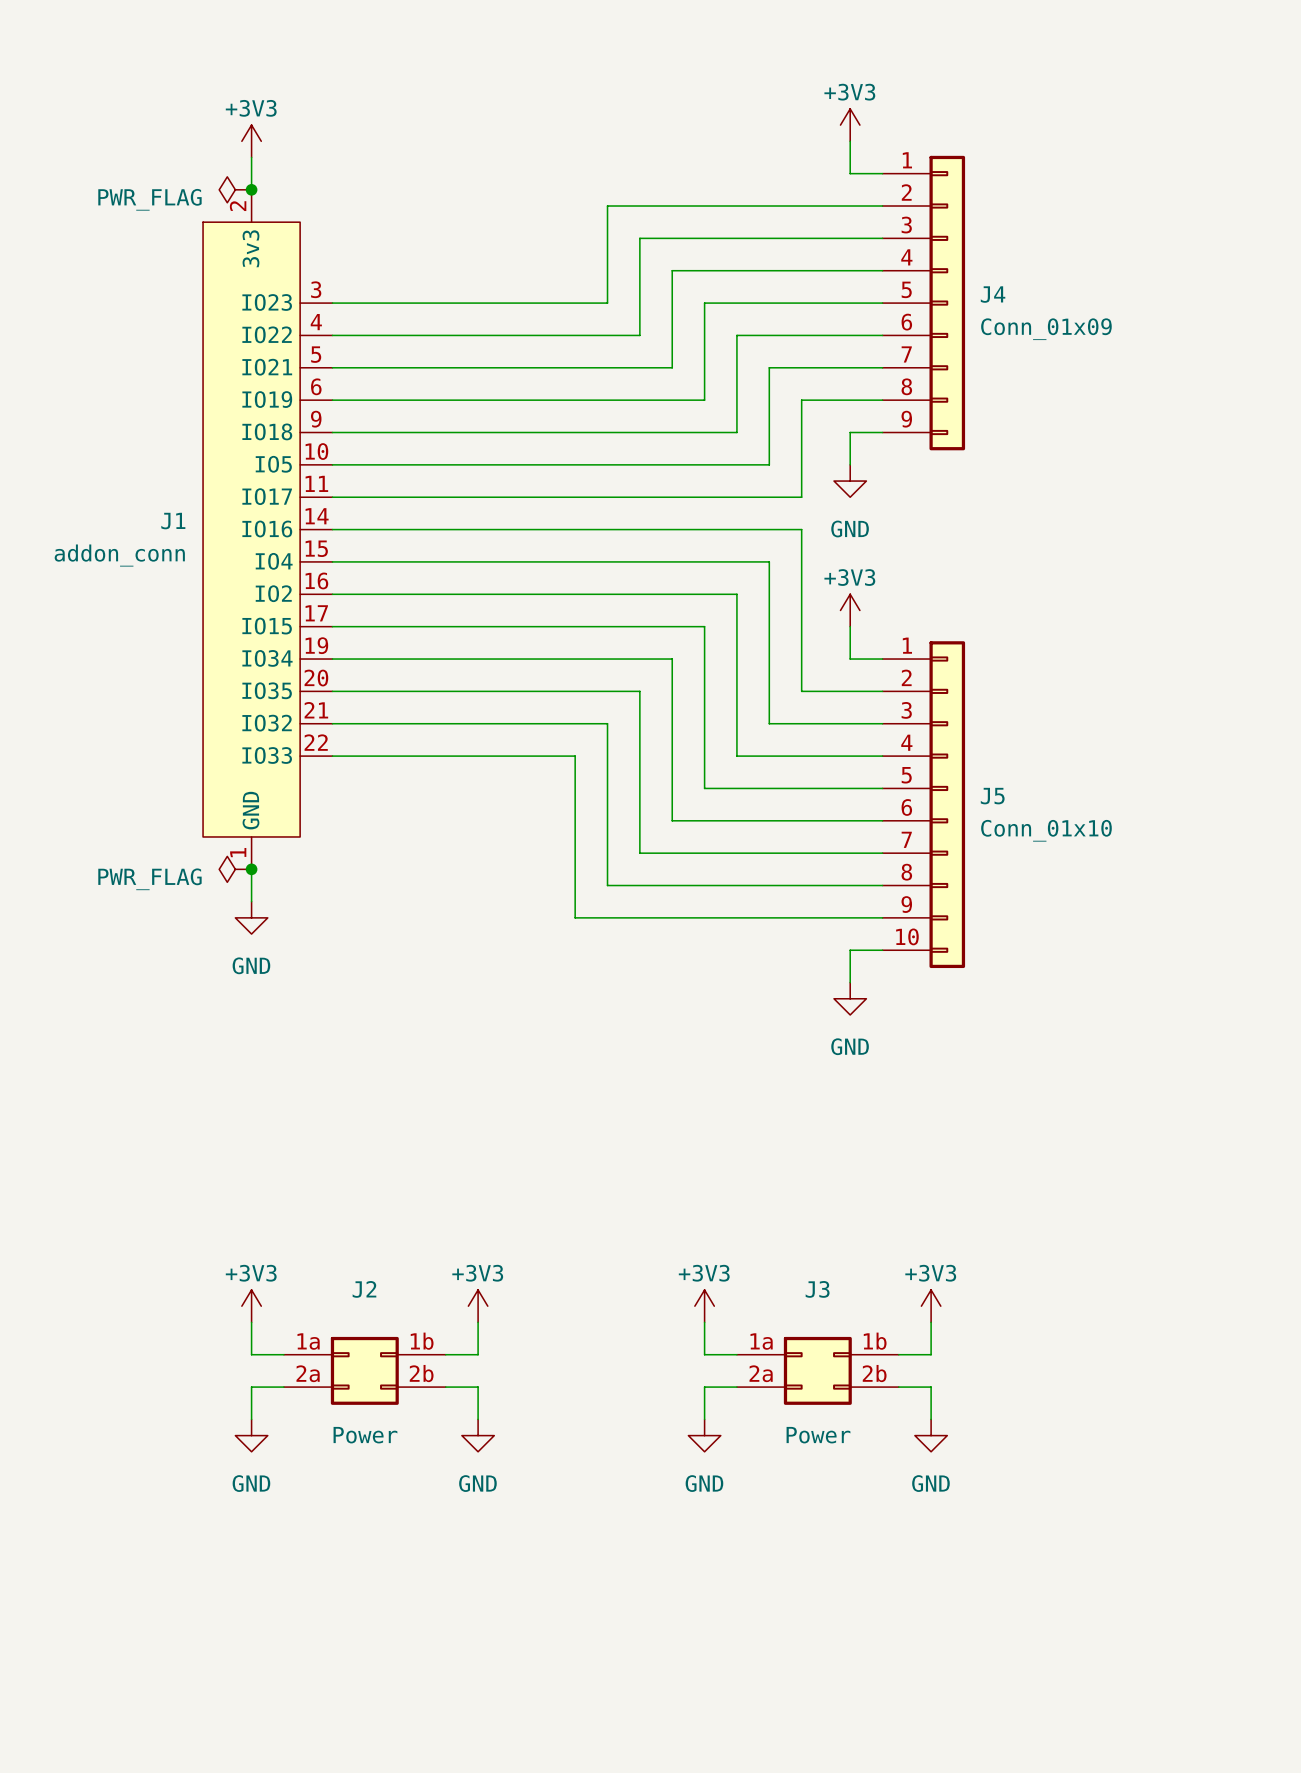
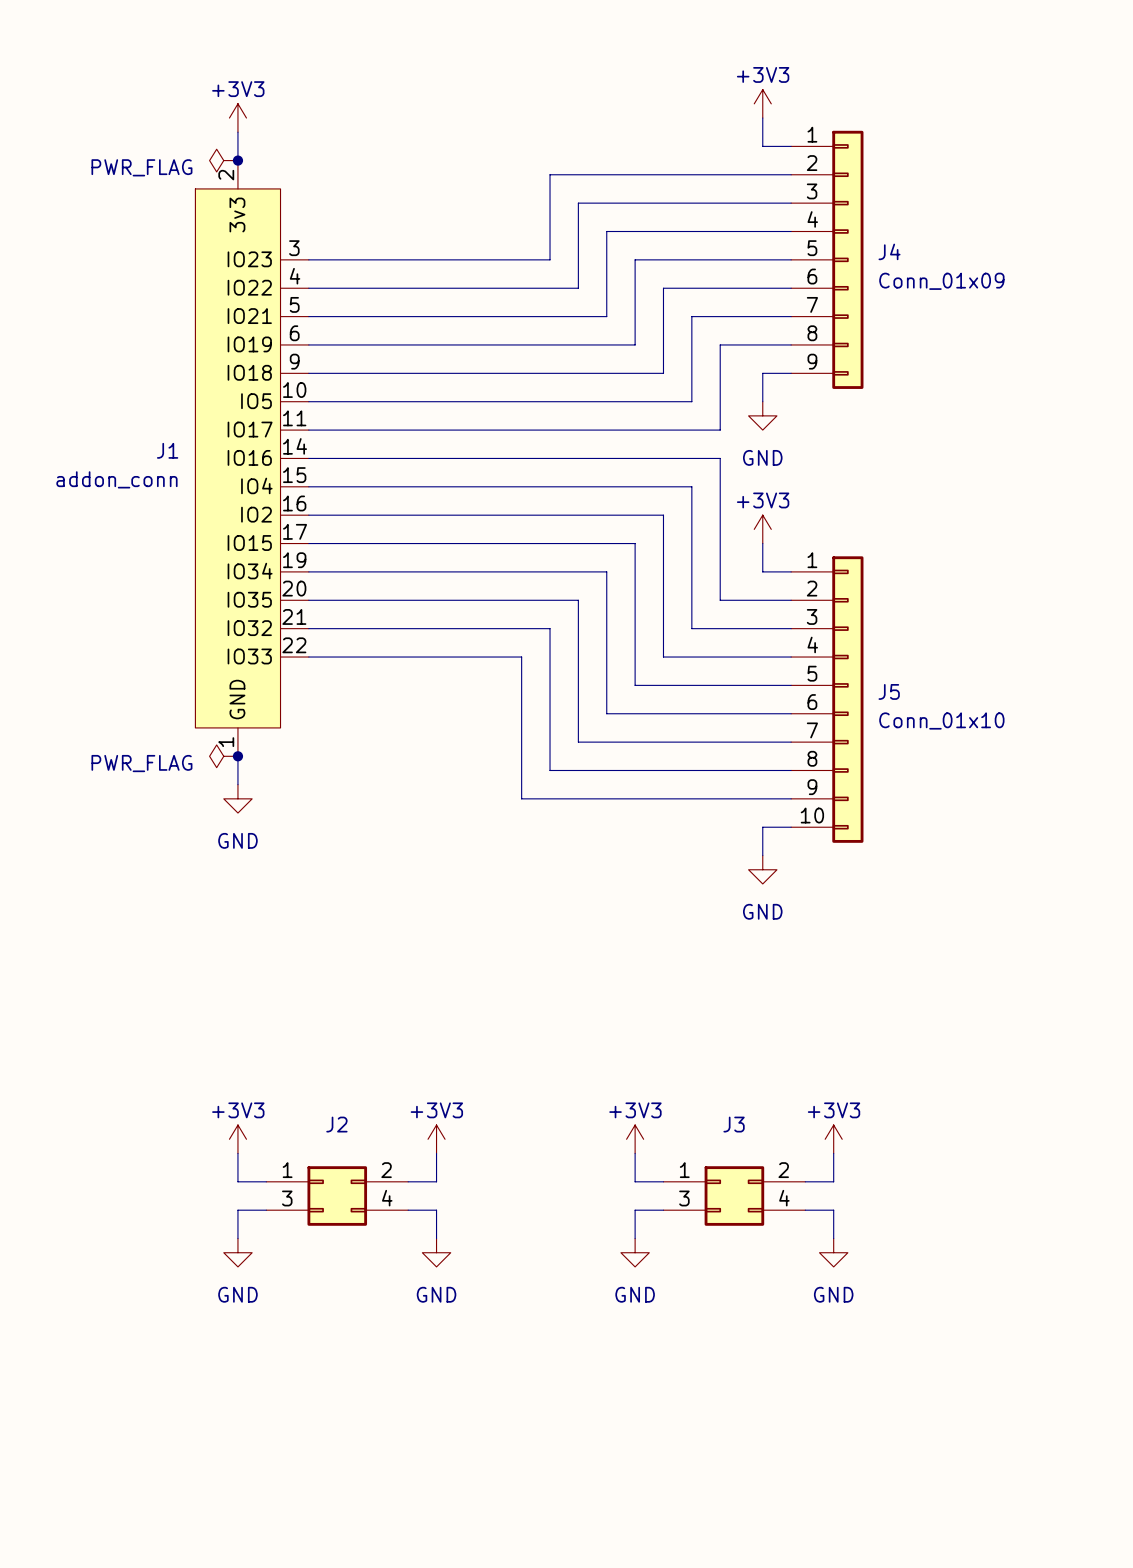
J2 pin number: 1a (308, 1341) -> 1 (287, 1170)
J2 pin number: 1b (422, 1341) -> 2 (386, 1170)
J3 pin number: 1a (761, 1341) -> 1 (684, 1170)
J3 pin number: 1b (875, 1341) -> 2 (783, 1170)
J2 pin number: 2a (308, 1373) -> 3 (287, 1198)
J2 pin number: 2b (421, 1373) -> 4 (387, 1198)
J3 pin number: 2a (761, 1373) -> 3 (684, 1198)
J3 pin number: 2b (874, 1373) -> 4 (784, 1198)
J2 value: Power (365, 1435) -> none
J3 value: Power (818, 1435) -> none

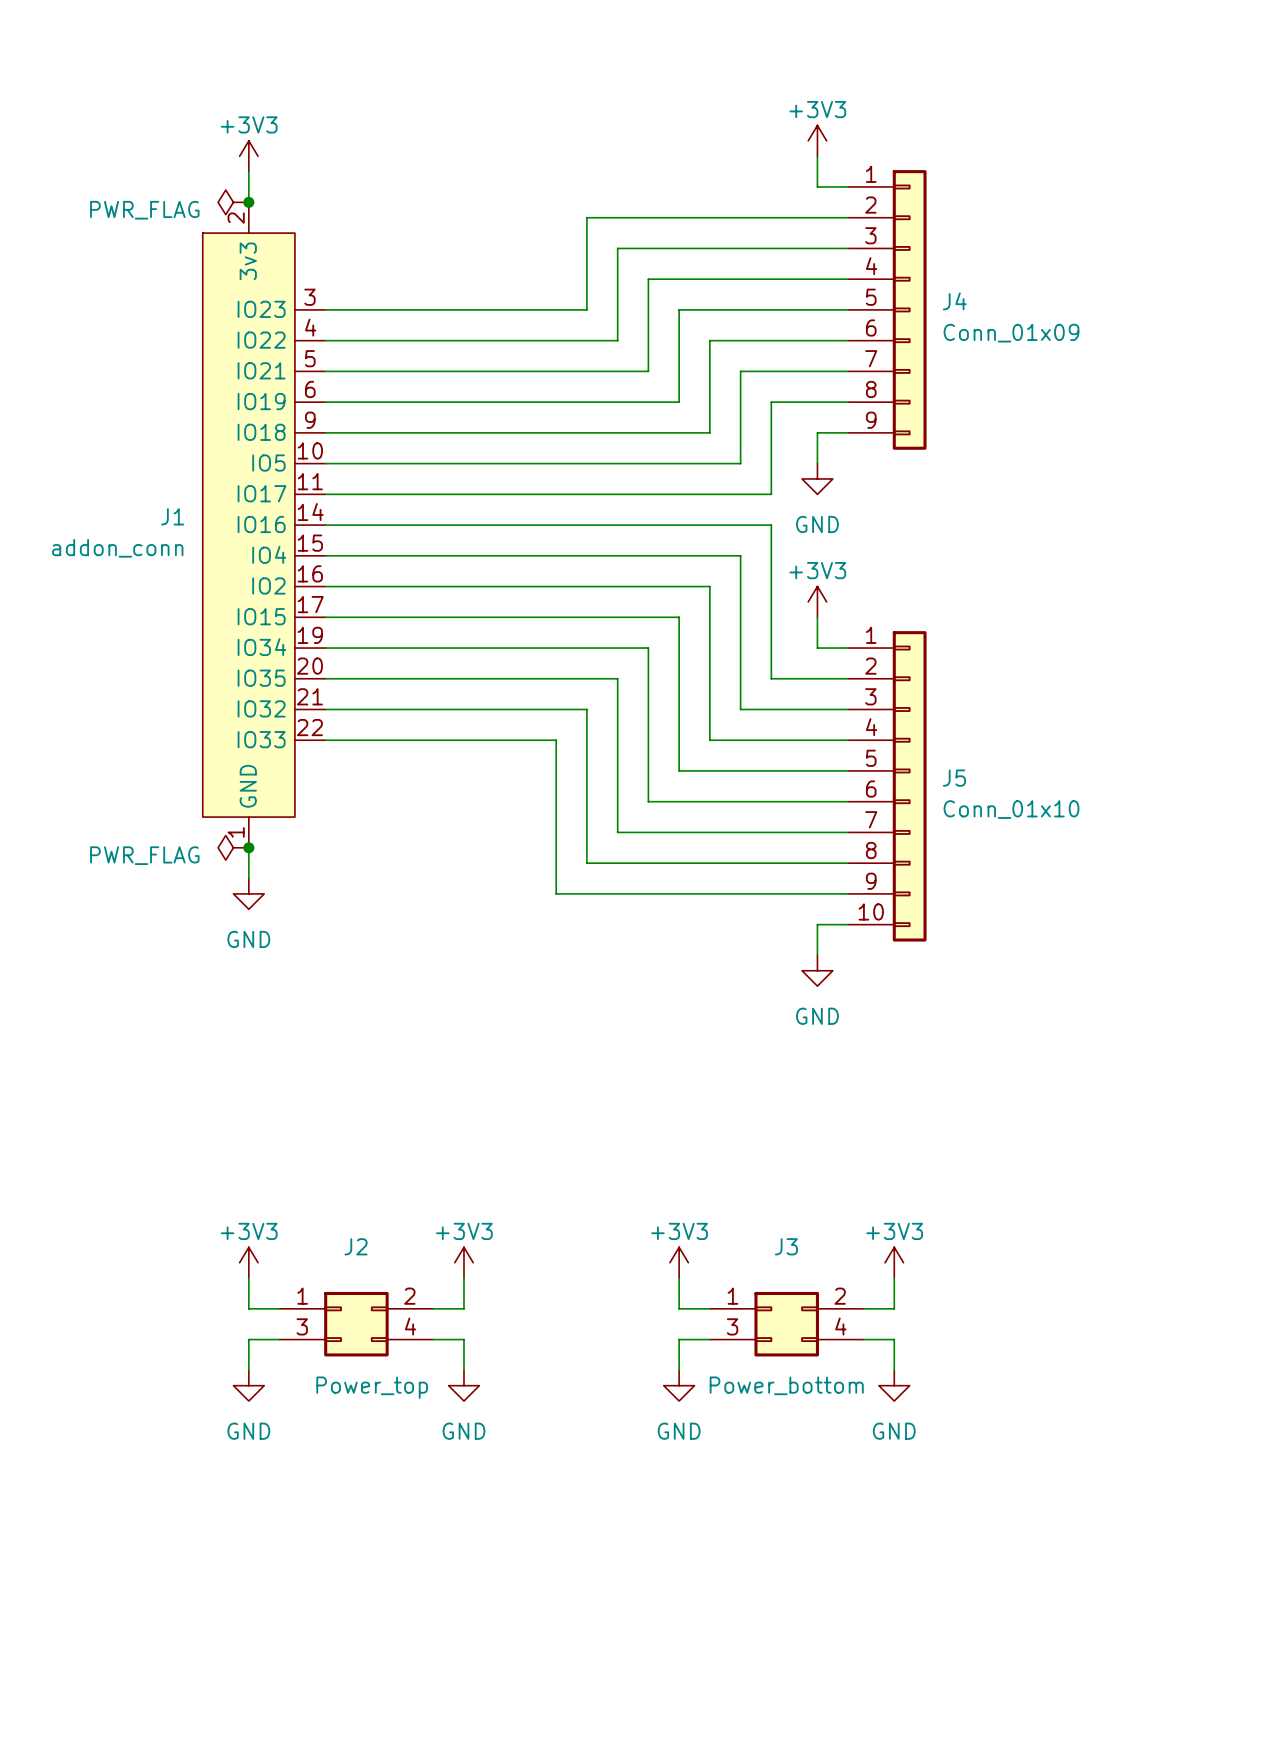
J3 value: none -> Power_bottom (786, 1385)
J2 value: none -> Power_top (372, 1387)

